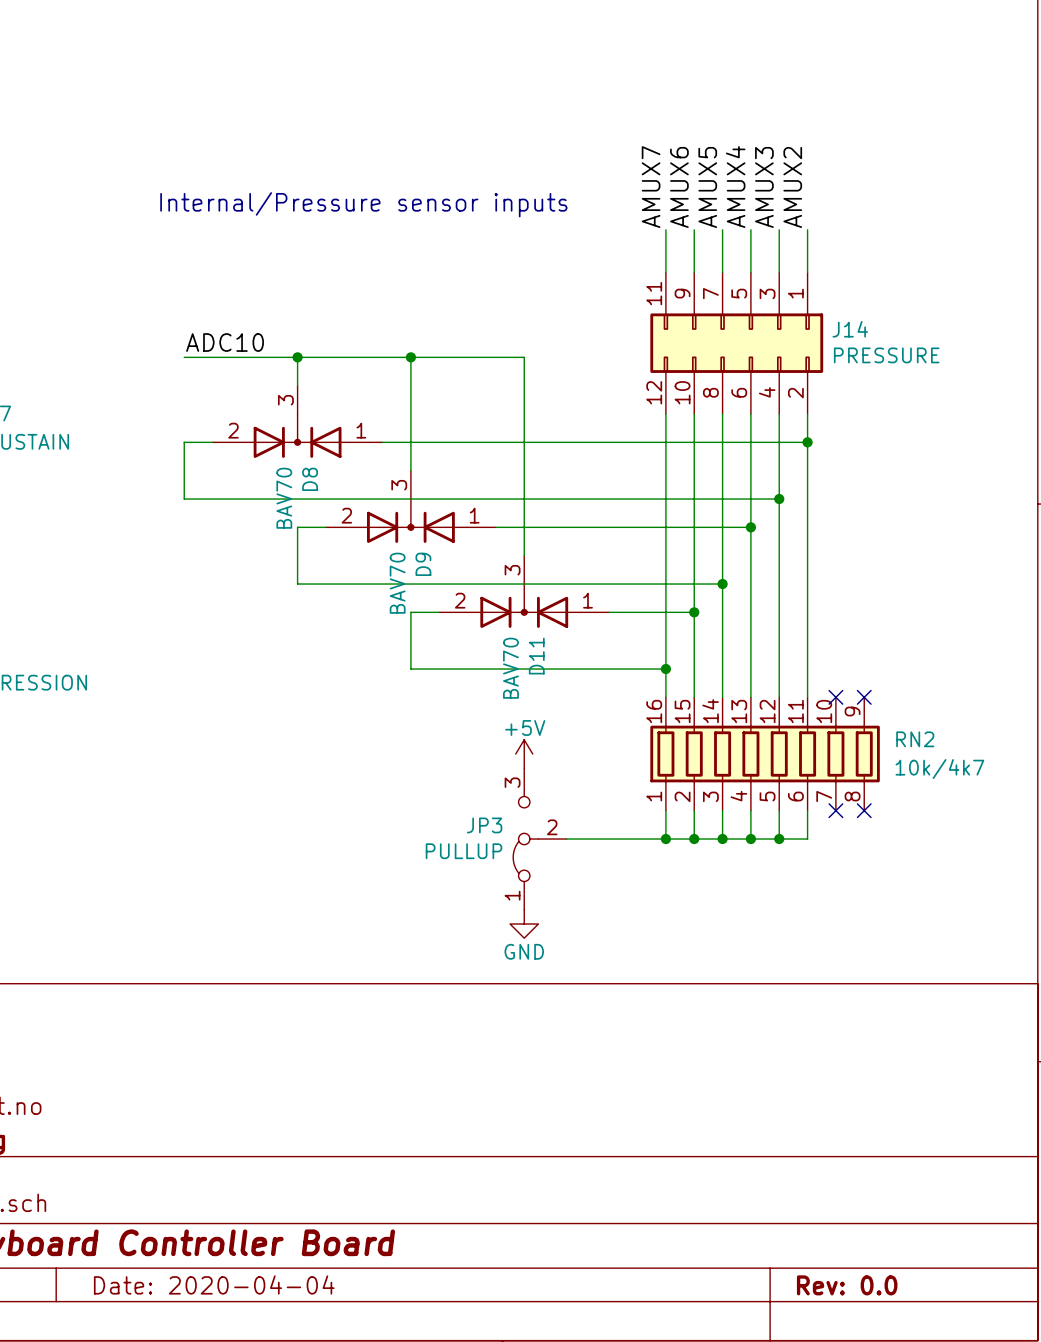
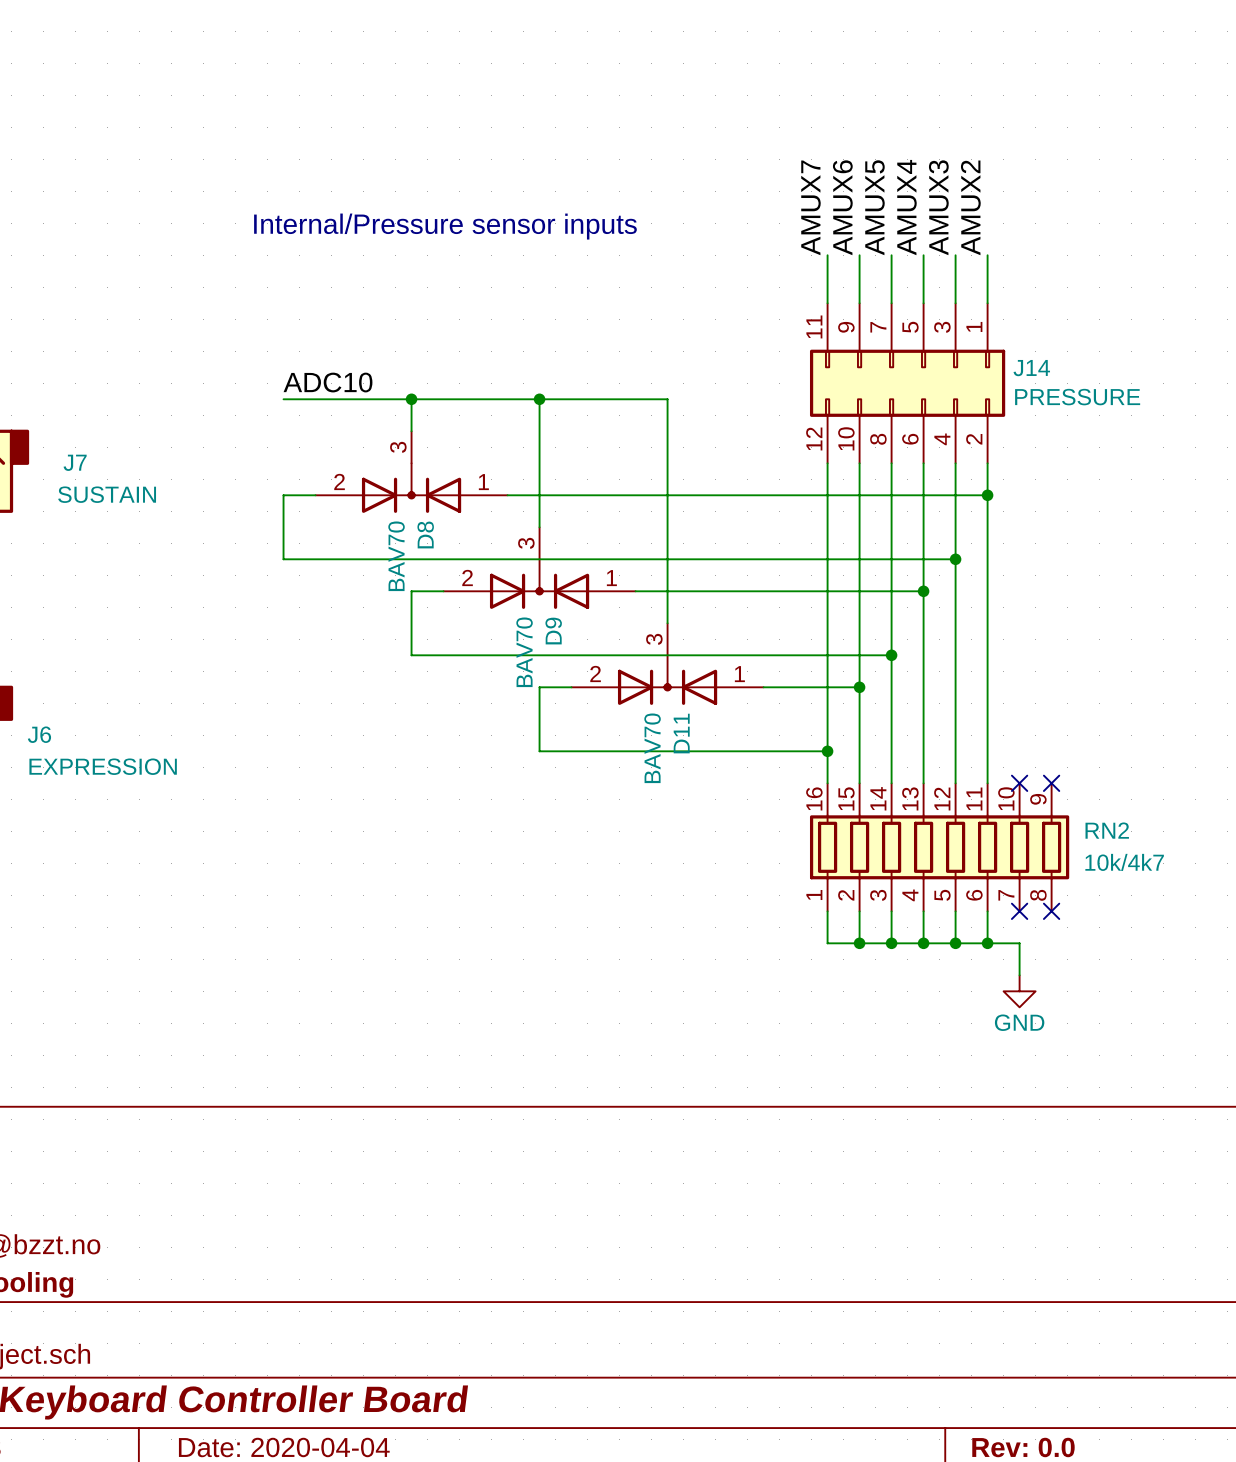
power symbol: +5V (524, 754) -> none
JP3: PULLUP (539, 839) -> none
wire: (566, 839) (665, 839) -> none
junction: (665, 839) -> none
wire: none -> (987, 943) (1019, 943) (1019, 975)
junction: none -> (987, 943)
power symbol: none -> GND (1019, 991)
power symbol: GND (524, 924) -> none

